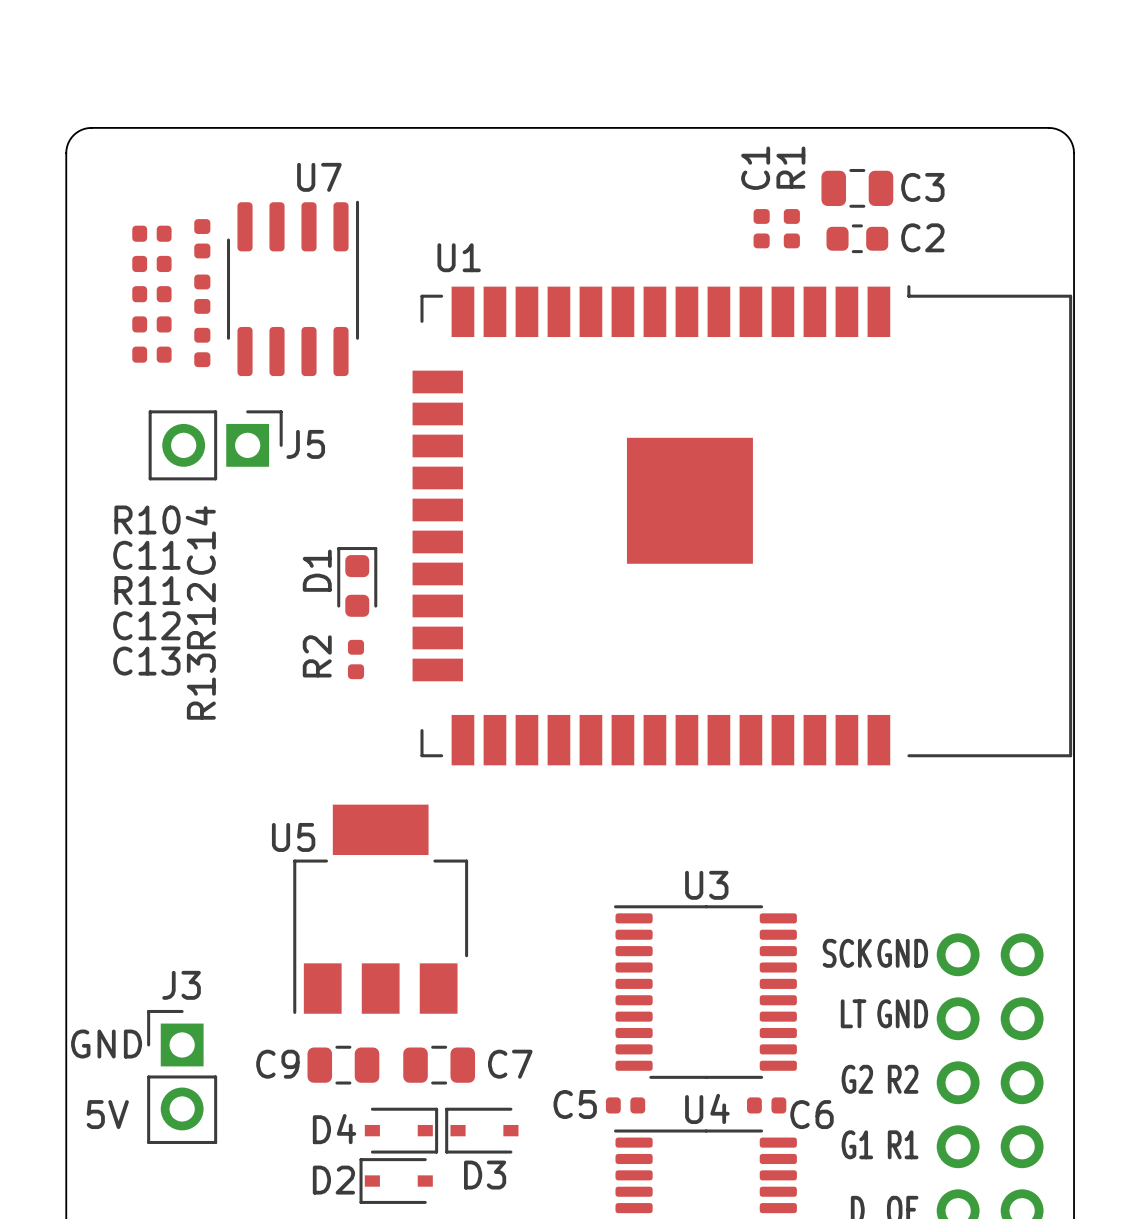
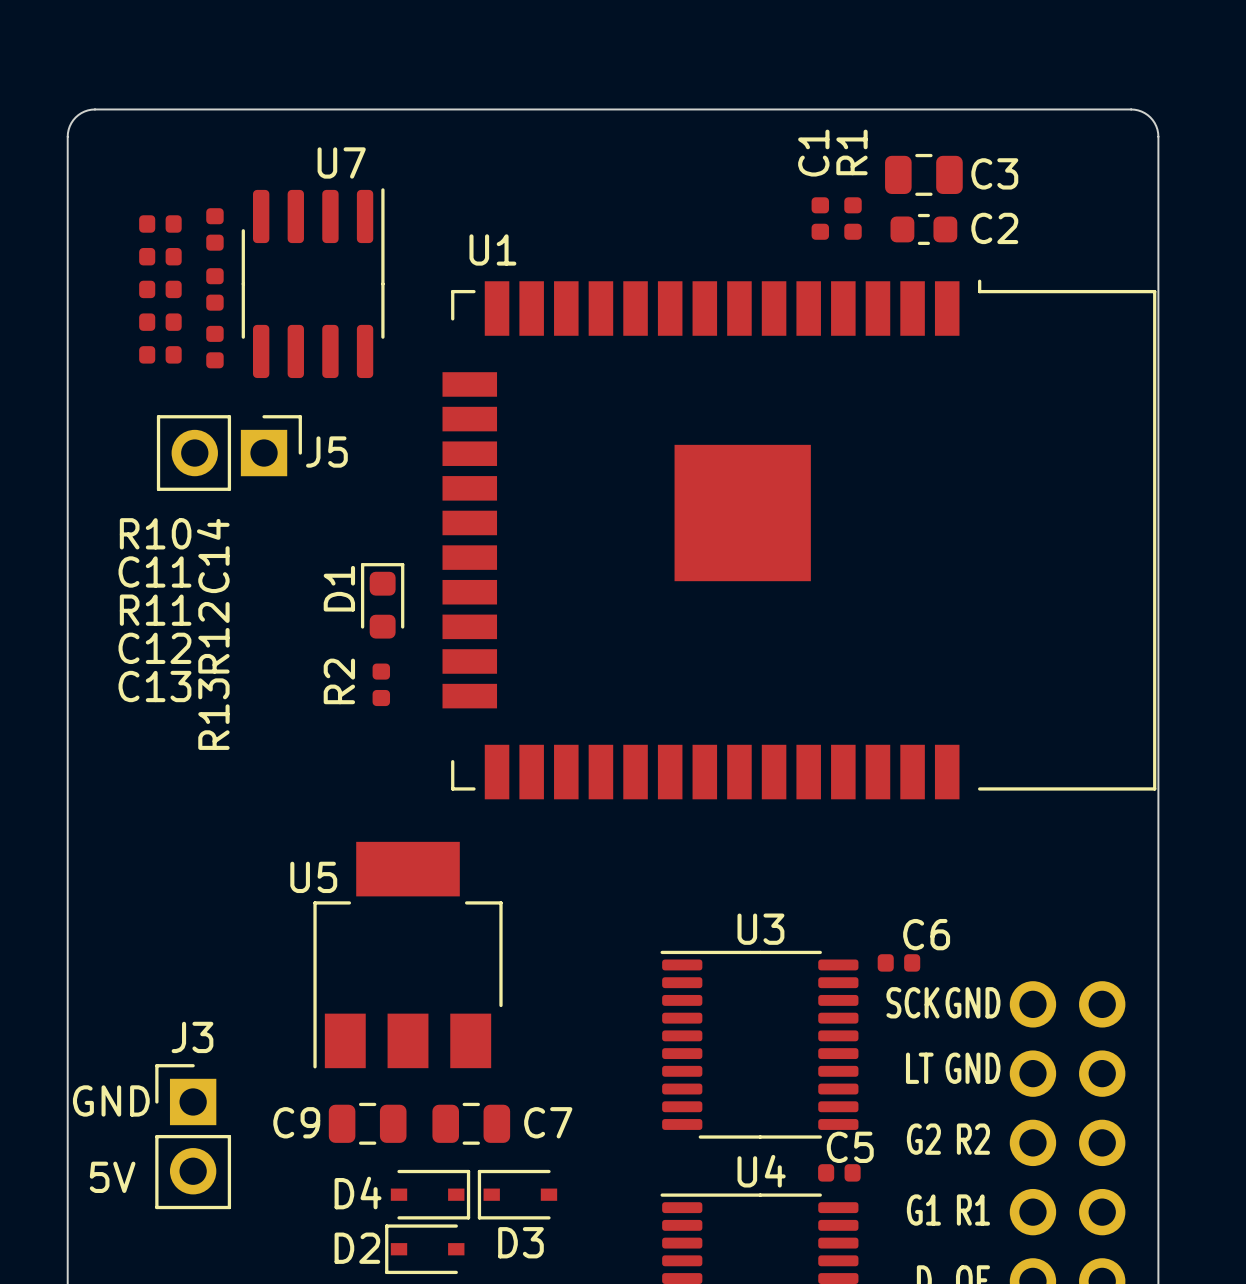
C5 name position: C5 (575, 1104) -> C5 (850, 1147)
C5 position: (625, 1105) -> (839, 1172)
C6 position: (766, 1105) -> (898, 962)
C6 name position: C6 (812, 1114) -> C6 (926, 934)

